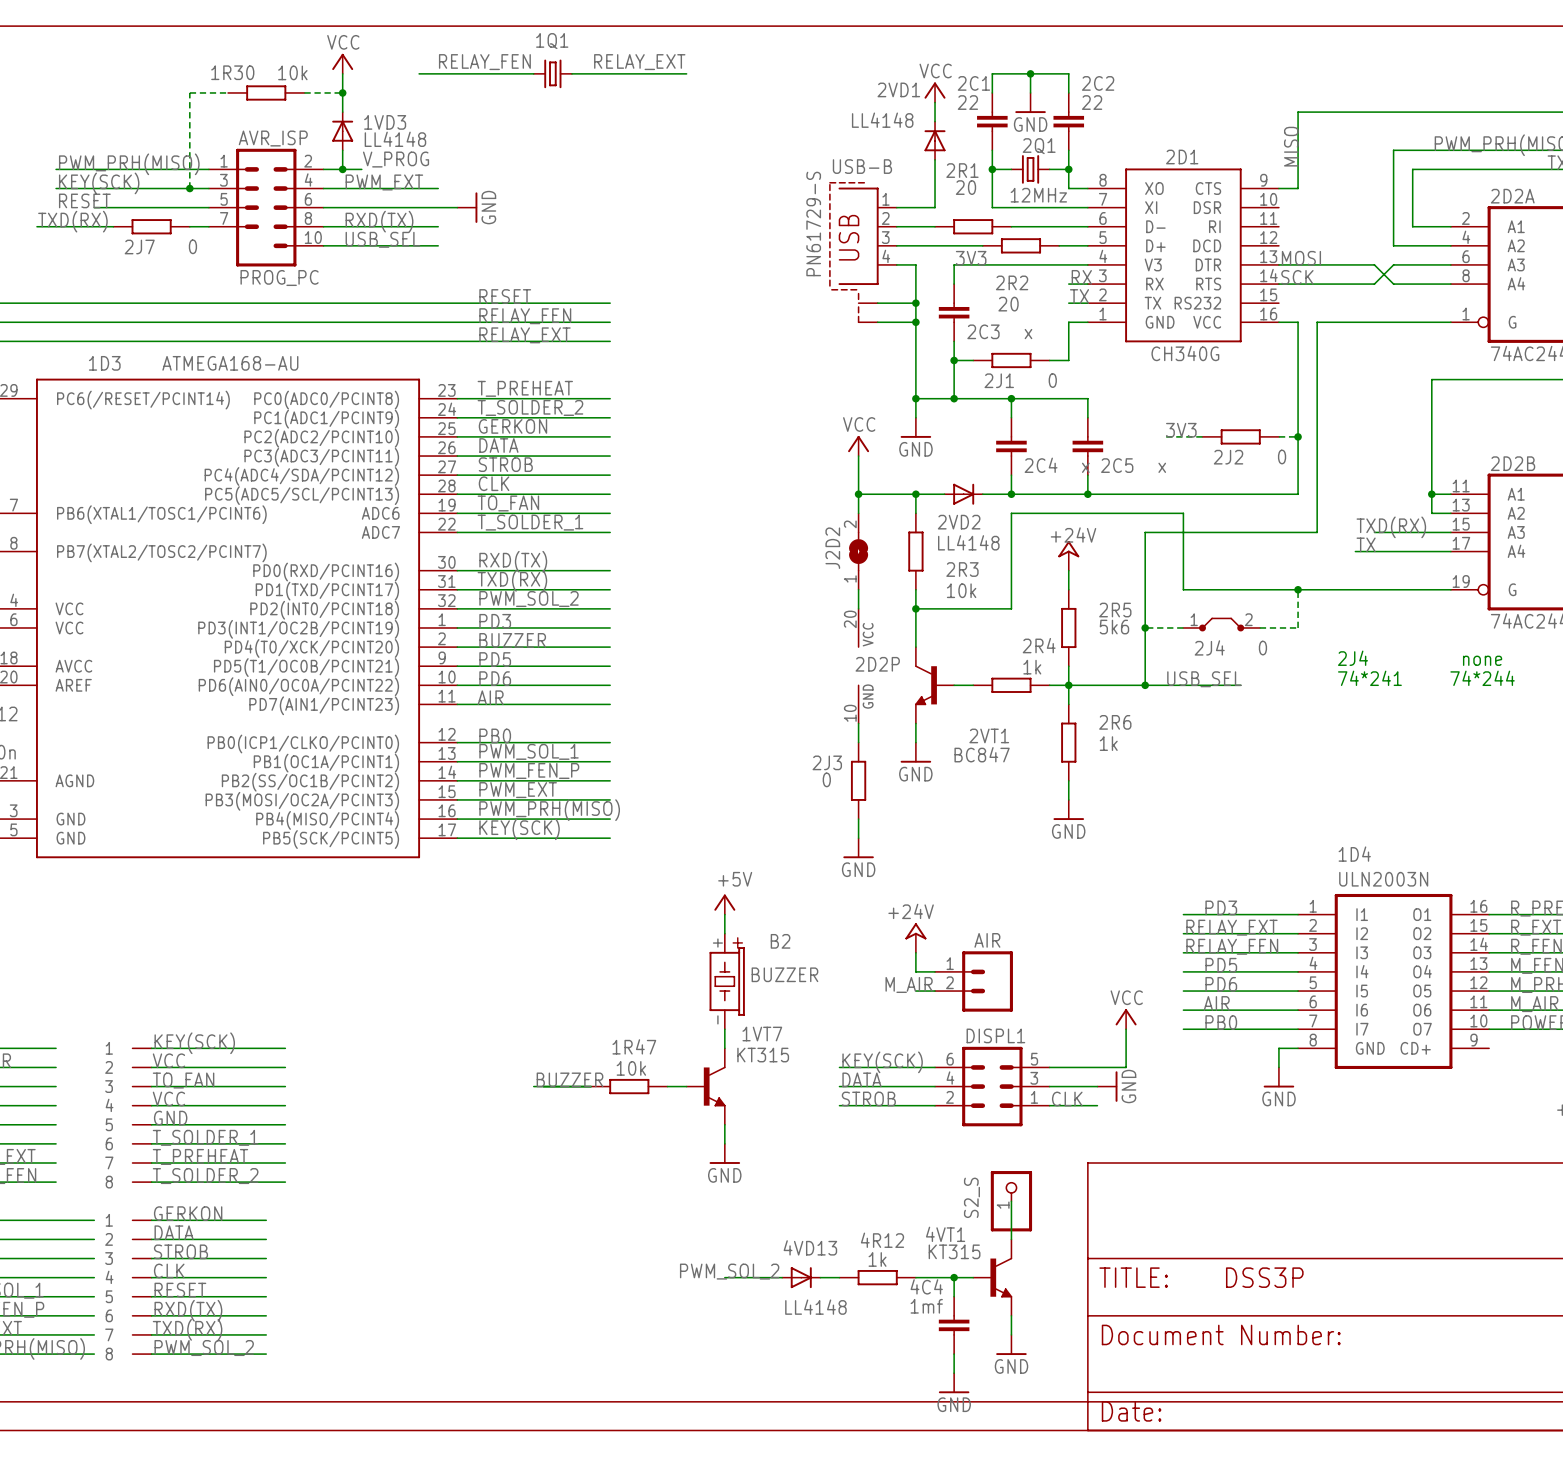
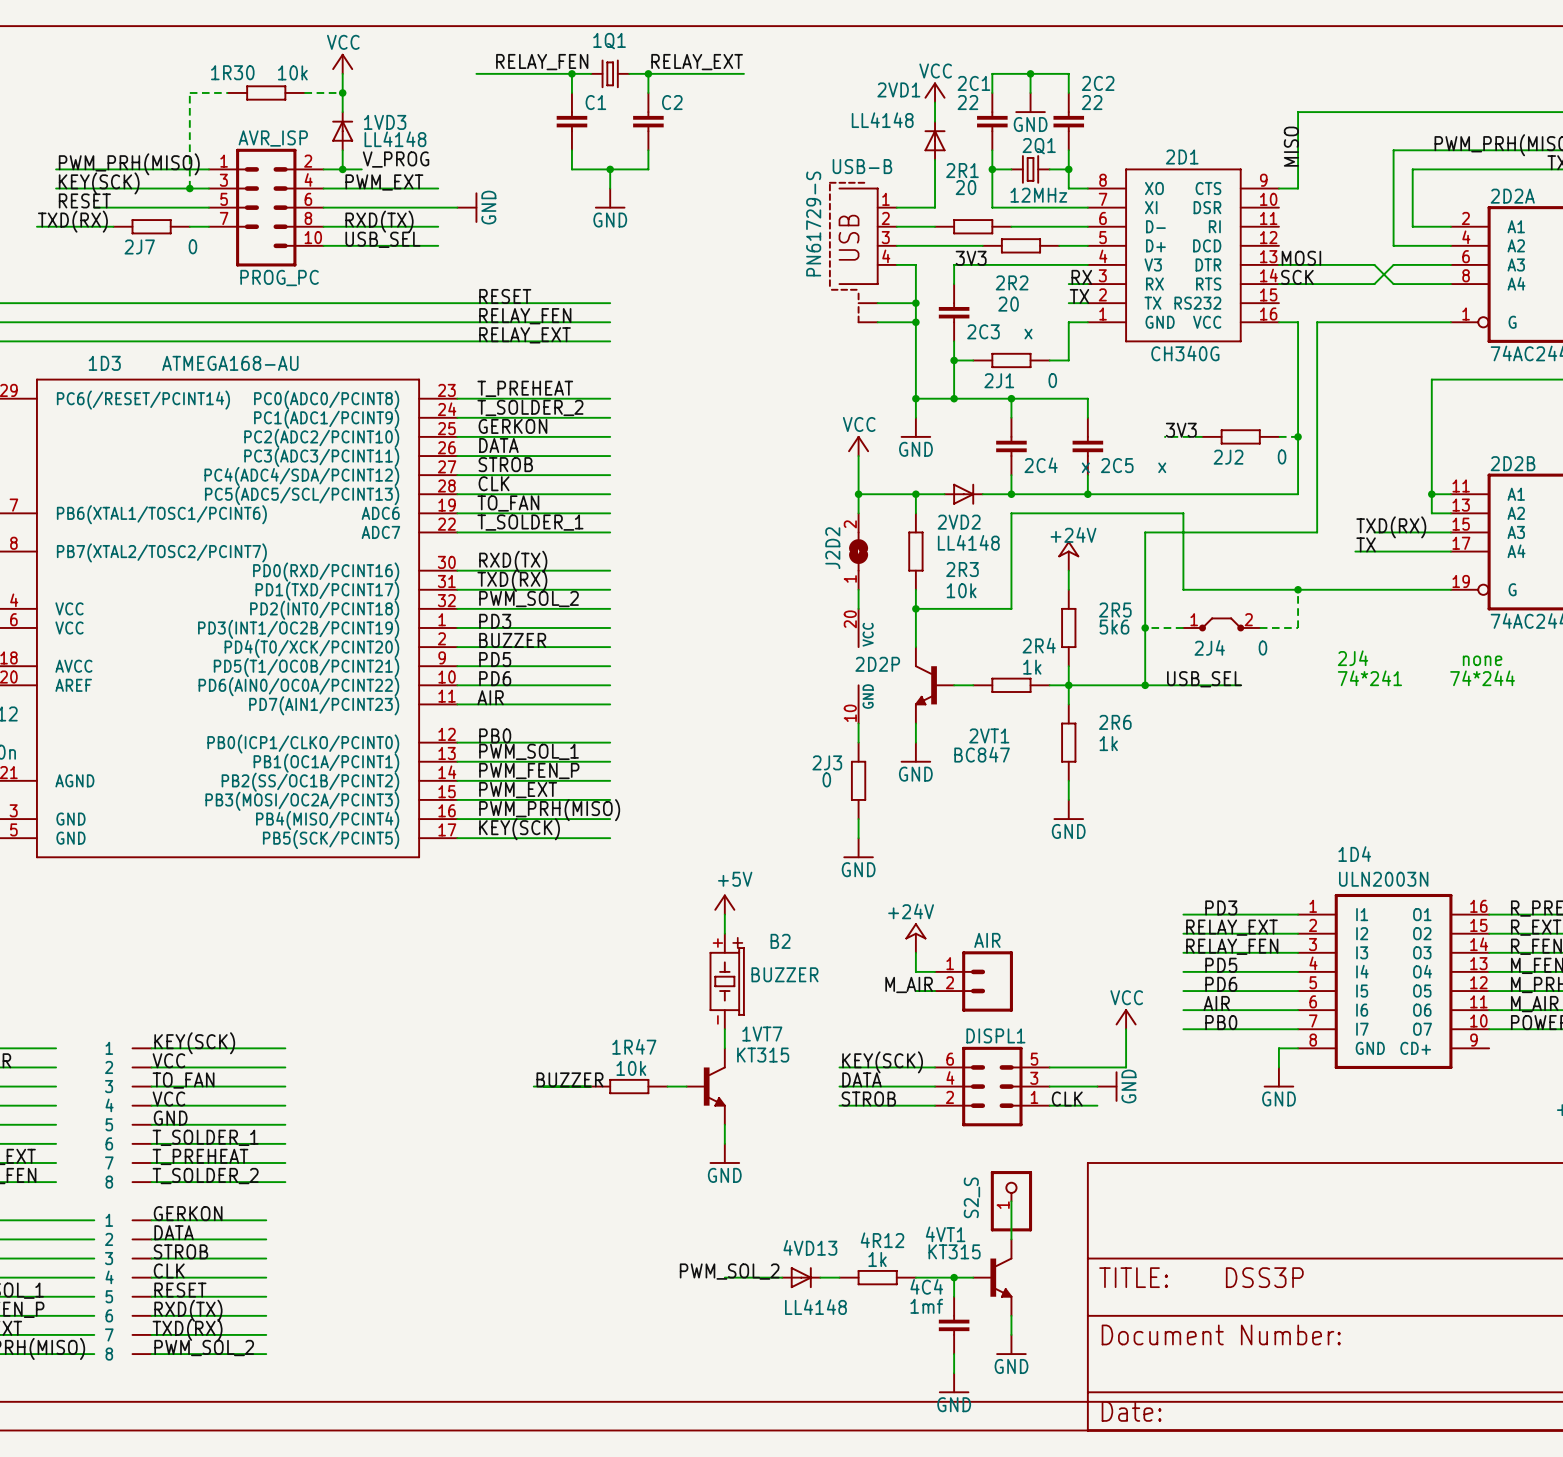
label position: RELAY_FEN (484, 62) -> RELAY_FEN (542, 62)
label position: RELAY_EXT (639, 62) -> RELAY_EXT (697, 62)
wire: (419, 73) (476, 73) -> none
wire: none -> (533, 73) (571, 73) (571, 92)
1Q1 position: (552, 73) -> (610, 73)
junction: none -> (571, 73)
wire: none -> (648, 73) (648, 92)
junction: none -> (648, 73)
wire: none -> (686, 73) (743, 73)
C1: none -> (571, 121)
C2: none -> (648, 121)
wire: none -> (571, 150) (571, 169) (648, 169) (648, 150)
wire: none -> (610, 169) (610, 188)
junction: none -> (610, 169)
power symbol: none -> GND (610, 198)

